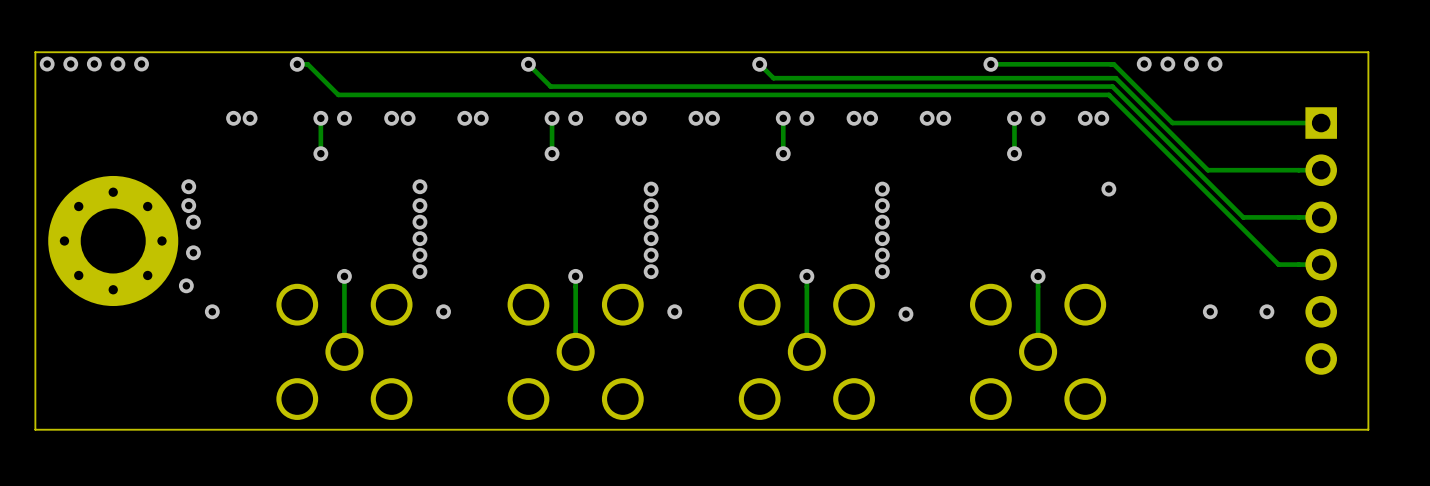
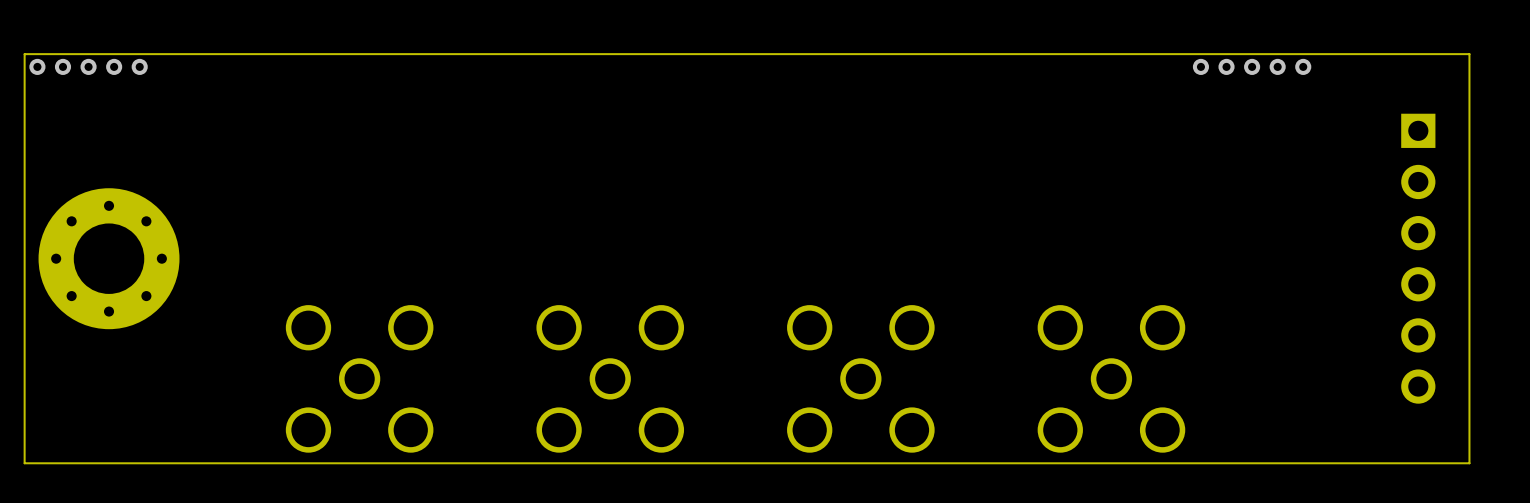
track: (297, 64) (307, 64) (338, 94) (1108, 94) (1278, 264) (1321, 264) -> none
via: (297, 64) -> none
track: (528, 64) (550, 86) (1112, 86) (1243, 217) (1321, 217) -> none
via: (528, 64) -> none
track: (759, 64) (773, 78) (1115, 78) (1207, 170) (1321, 170) -> none
via: (759, 64) -> none
track: (990, 64) (1113, 64) (1172, 123) (1321, 123) (1318, 120) -> none
via: (990, 64) -> none
via: none -> (1200, 66)
via: (233, 118) -> none
via: (250, 118) -> none
track: (320, 118) (320, 153) -> none
via: (320, 118) -> none
via: (344, 118) -> none
via: (391, 118) -> none
via: (408, 118) -> none
via: (464, 118) -> none
via: (481, 118) -> none
track: (552, 118) (552, 153) -> none
via: (552, 118) -> none
via: (575, 118) -> none
via: (622, 118) -> none
via: (639, 118) -> none
via: (695, 118) -> none
via: (712, 118) -> none
track: (783, 118) (783, 153) -> none
via: (783, 118) -> none
via: (806, 118) -> none
via: (854, 118) -> none
via: (870, 118) -> none
via: (927, 118) -> none
via: (943, 118) -> none
track: (1014, 118) (1014, 153) -> none
via: (1014, 118) -> none
via: (1038, 118) -> none
via: (1085, 118) -> none
via: (1101, 118) -> none
via: (320, 153) -> none
via: (552, 153) -> none
via: (783, 153) -> none
via: (1014, 153) -> none
via: (188, 186) -> none
via: (419, 186) -> none
via: (651, 189) -> none
via: (882, 189) -> none
via: (1108, 189) -> none
via: (188, 205) -> none
via: (419, 205) -> none
via: (651, 205) -> none
via: (882, 205) -> none
via: (193, 222) -> none
via: (419, 222) -> none
via: (651, 222) -> none
via: (882, 222) -> none
via: (419, 238) -> none
via: (651, 238) -> none
via: (882, 238) -> none
via: (193, 252) -> none
via: (419, 255) -> none
via: (651, 255) -> none
via: (882, 255) -> none
via: (419, 271) -> none
via: (651, 271) -> none
via: (882, 271) -> none
track: (344, 276) (344, 351) -> none
via: (344, 276) -> none
track: (575, 276) (575, 351) -> none
via: (575, 276) -> none
track: (806, 276) (806, 351) -> none
via: (806, 276) -> none
track: (1038, 276) (1038, 351) -> none
via: (1038, 276) -> none
via: (186, 285) -> none
via: (212, 311) -> none
via: (443, 311) -> none
via: (674, 311) -> none
via: (1210, 311) -> none
via: (1266, 311) -> none
via: (905, 314) -> none

